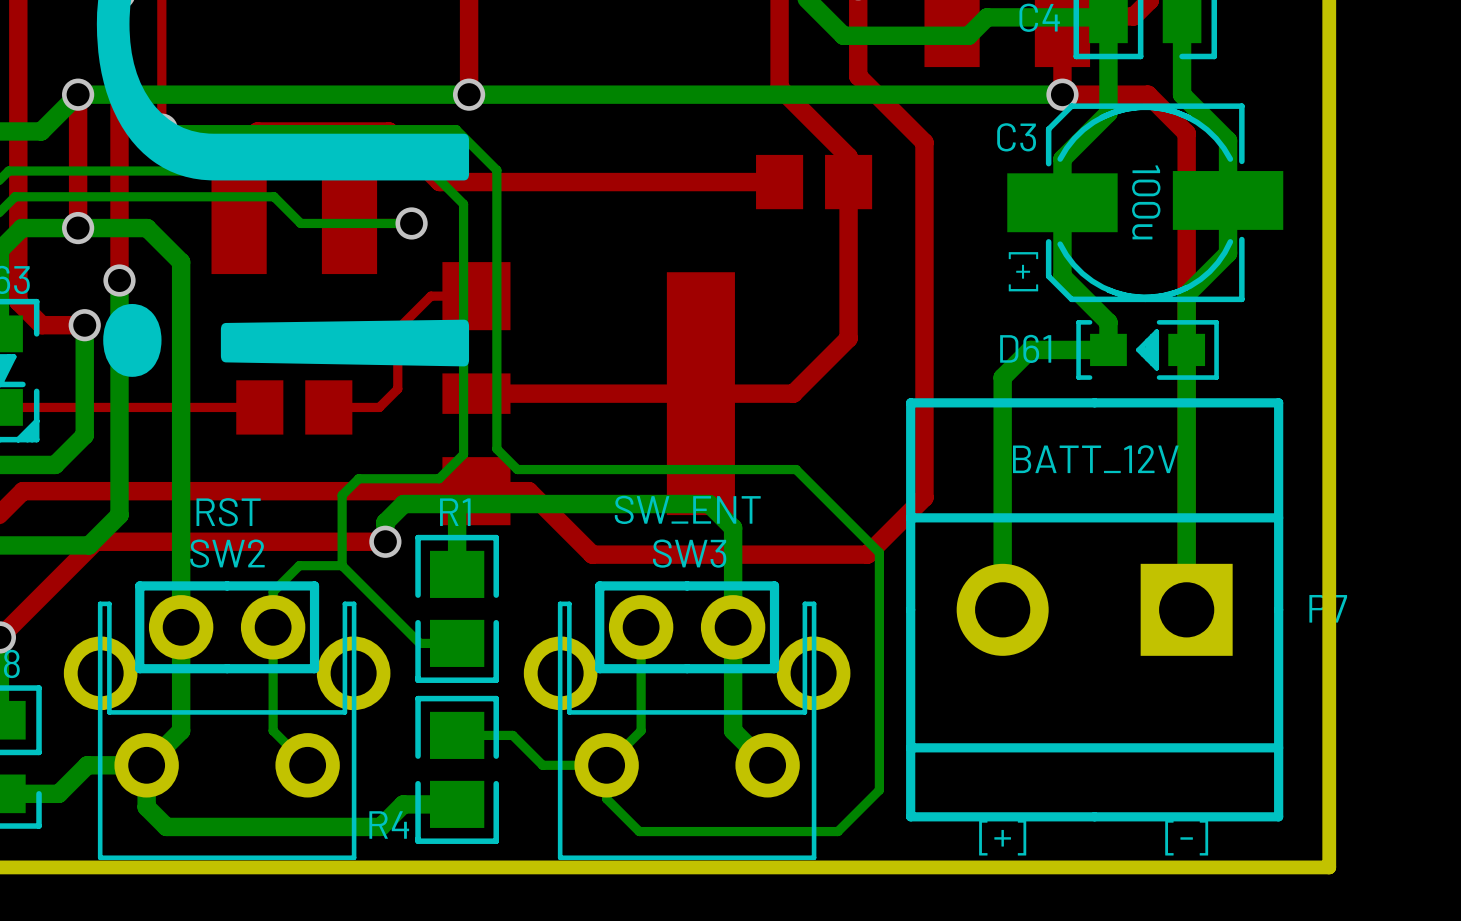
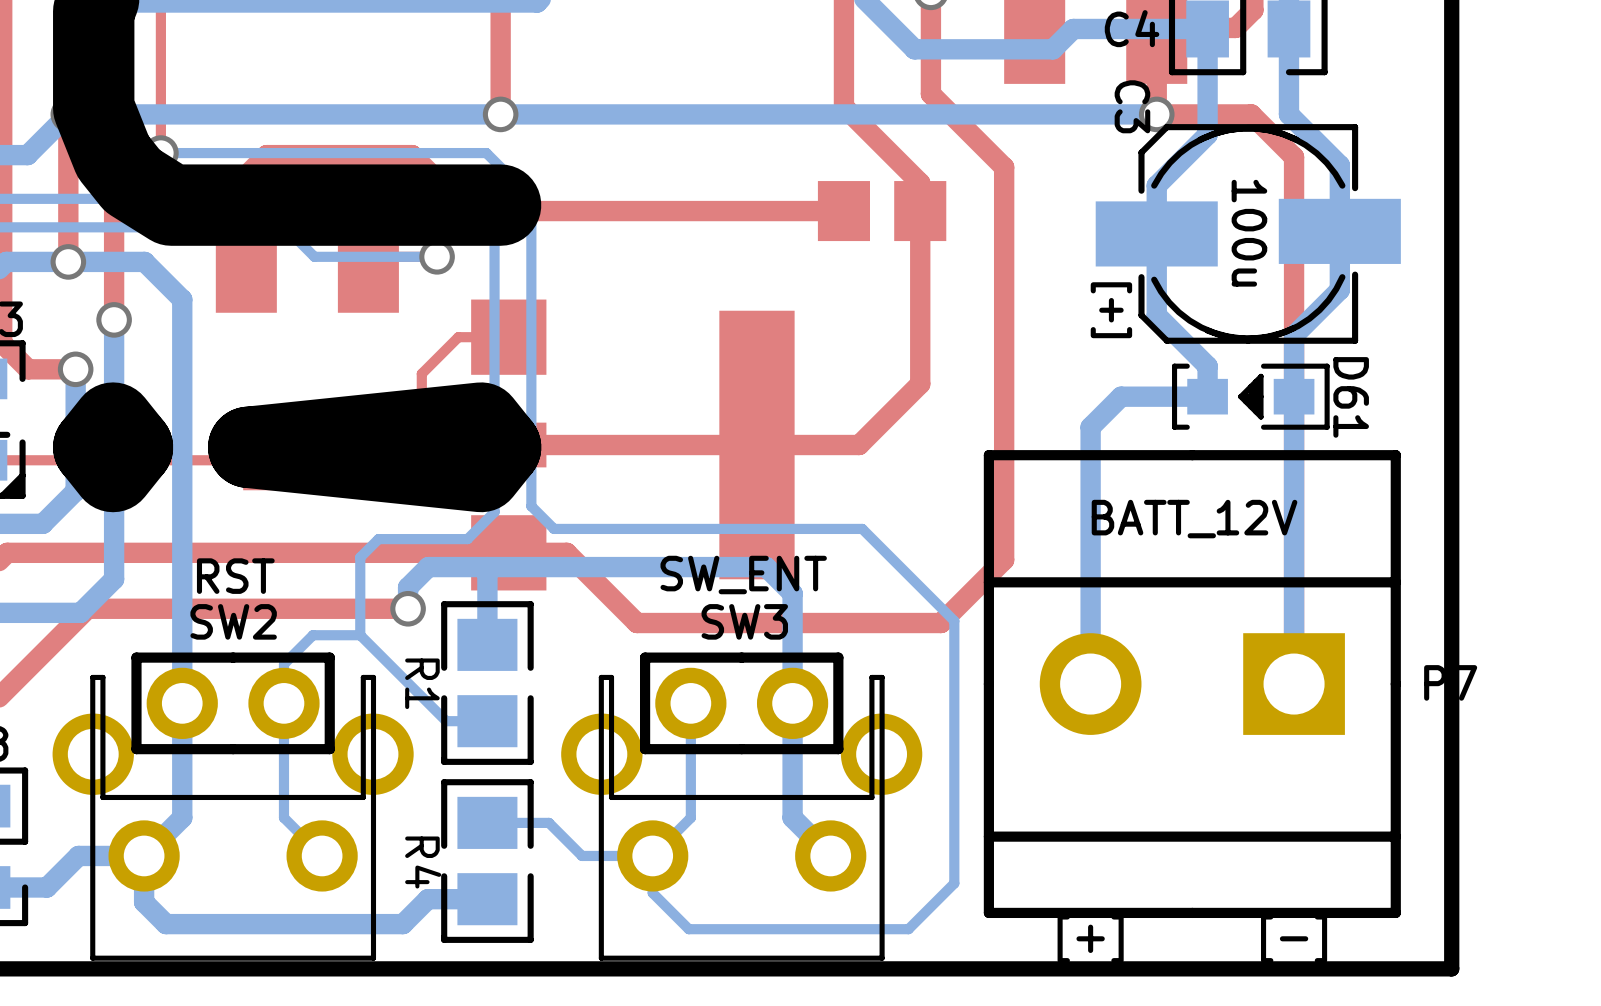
C3 name rotation: 0° (1016, 137) -> 90° clockwise (1132, 106)
D61 name rotation: 0° (1025, 348) -> 90° clockwise (1351, 397)
D61 name position: D61 (1025, 348) -> D61 (1351, 397)
R1 name rotation: 0° (455, 512) -> 90° clockwise (422, 683)
R1 name position: R1 (455, 512) -> R1 (422, 683)
R4 name rotation: 0° (389, 824) -> 90° clockwise (423, 862)

